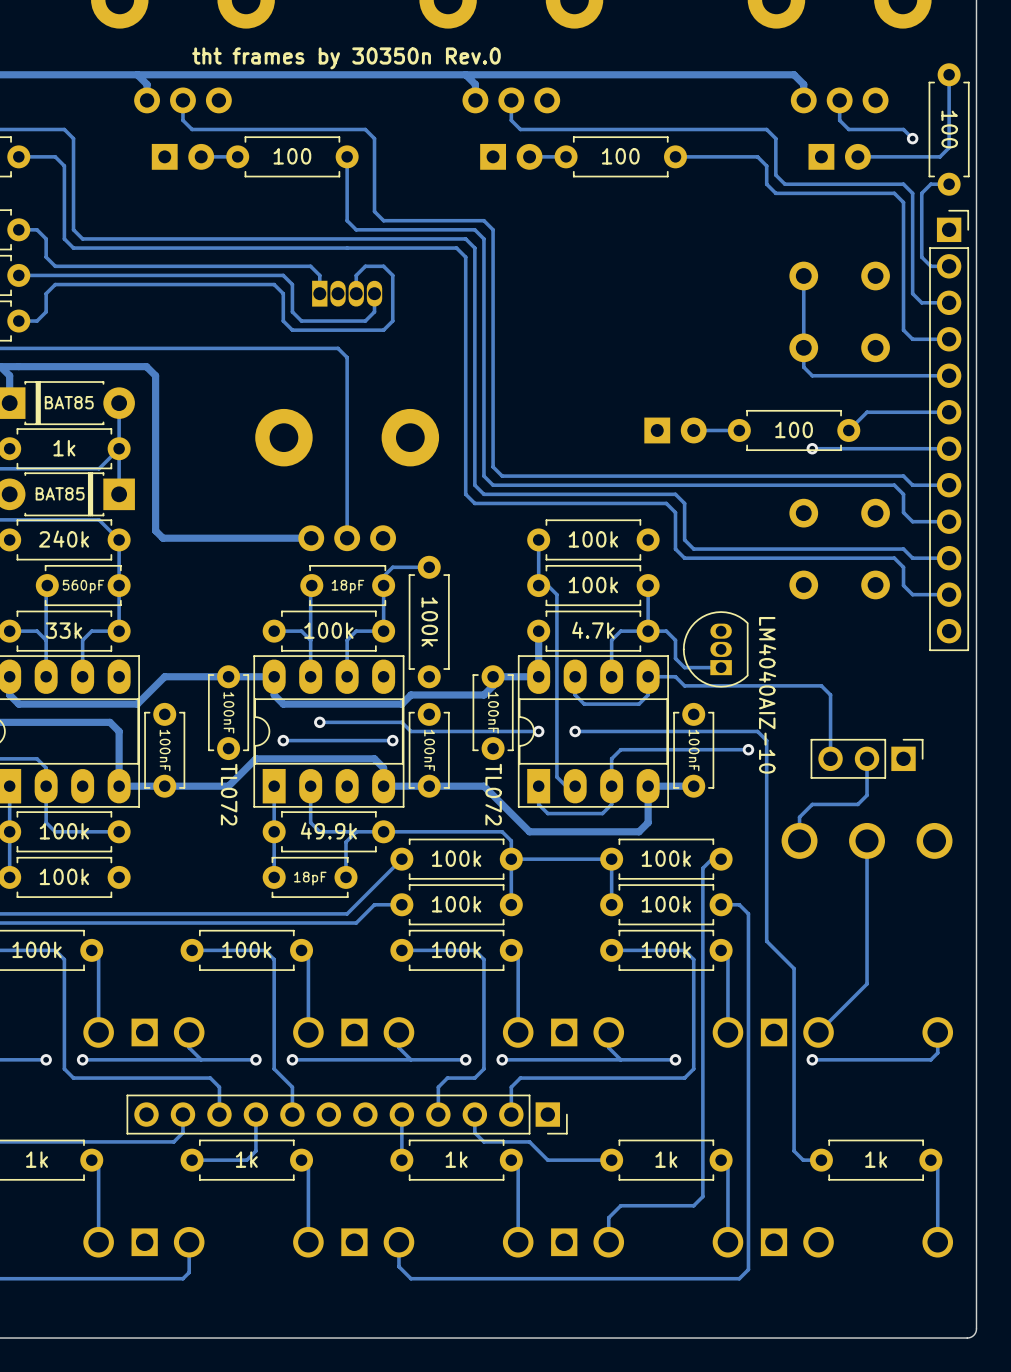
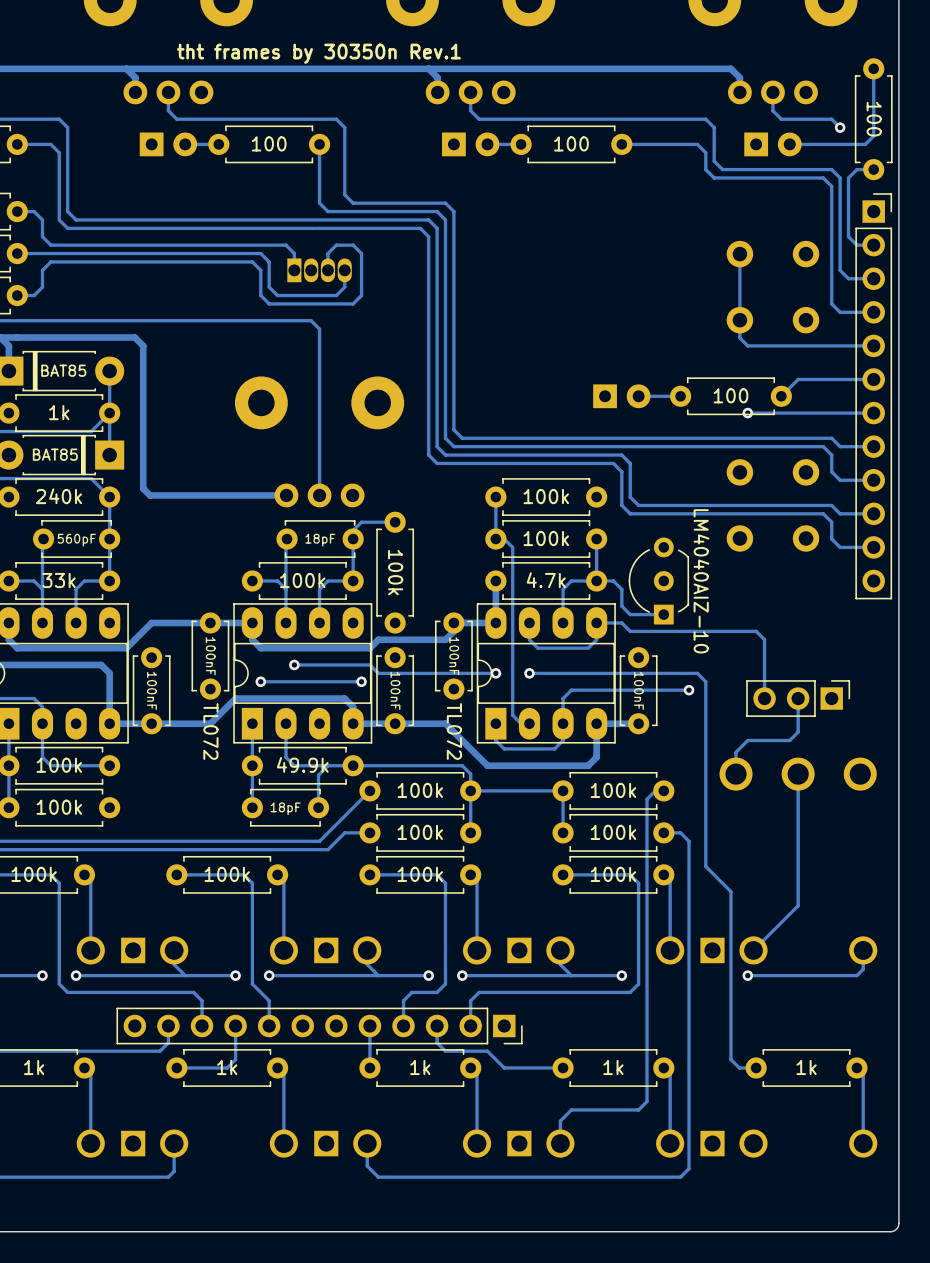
text: tht frames by 30350n Rev.0 (346, 58) -> tht frames by 30350n Rev.1 (318, 53)
part: none -> LM4040AIZ-10 (658, 581)
part: LM4040AIZ-10 (715, 649) -> none

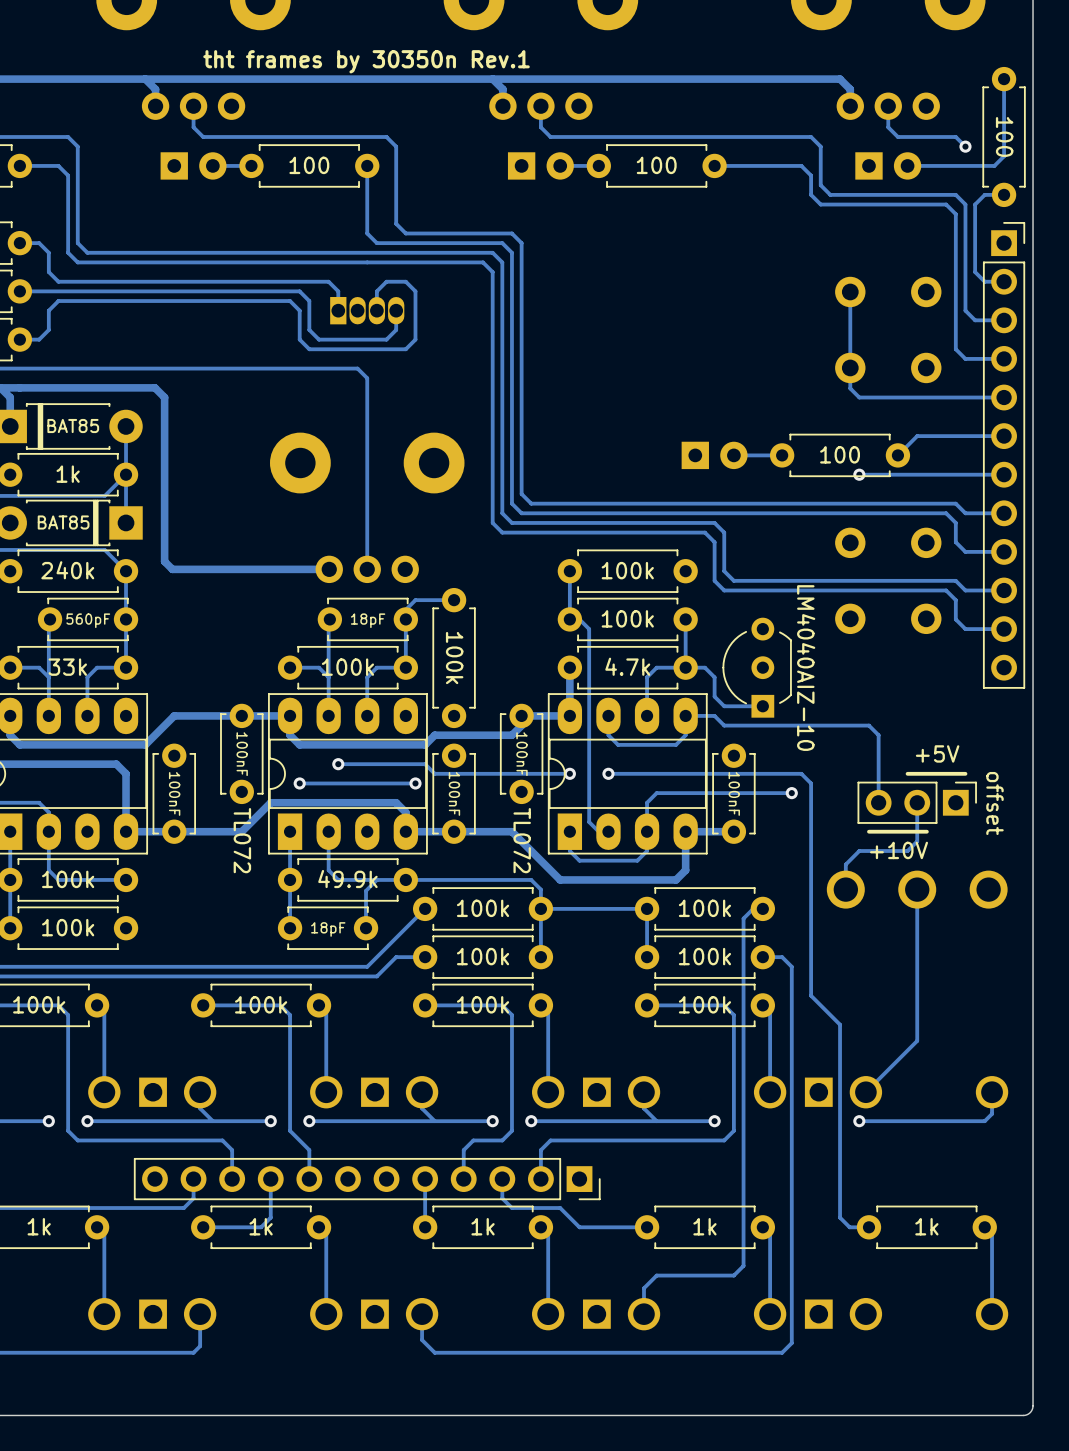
text: none -> +5V (937, 753)
line: none -> (965, 773) (907, 773)
text: none -> offset (994, 803)
line: none -> (926, 831) (868, 831)
text: none -> +10V (899, 850)

